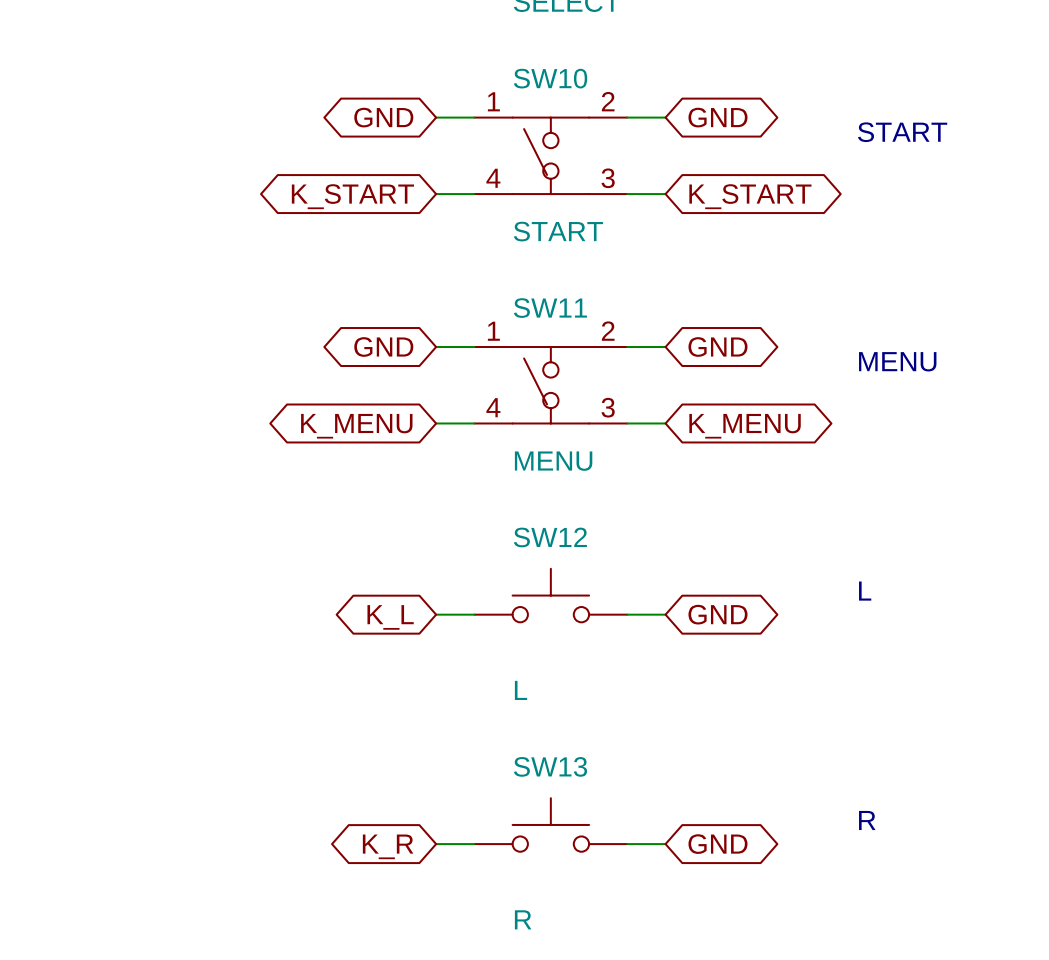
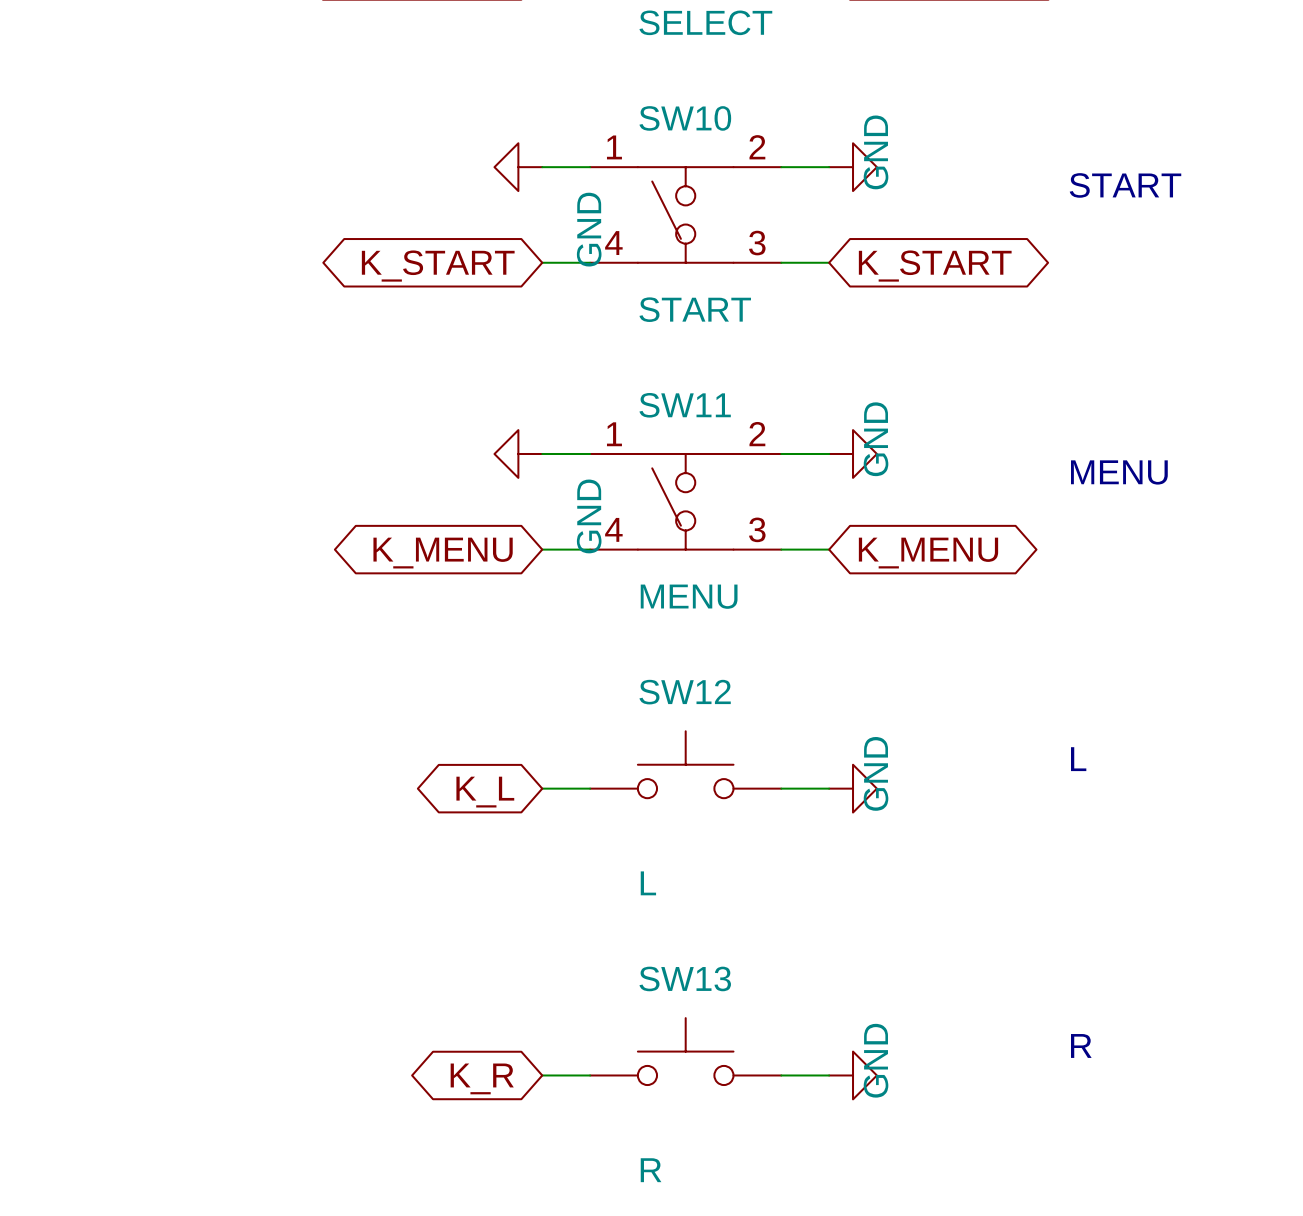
global label: GND (383, 117) -> none
power symbol: none -> GND (518, 167)
power symbol: none -> GND (853, 167)
global label: GND (717, 117) -> none
global label: GND (383, 347) -> none
power symbol: none -> GND (518, 453)
power symbol: none -> GND (853, 453)
global label: GND (717, 347) -> none
power symbol: none -> GND (853, 788)
global label: GND (717, 614) -> none
power symbol: none -> GND (853, 1075)
global label: GND (717, 844) -> none

